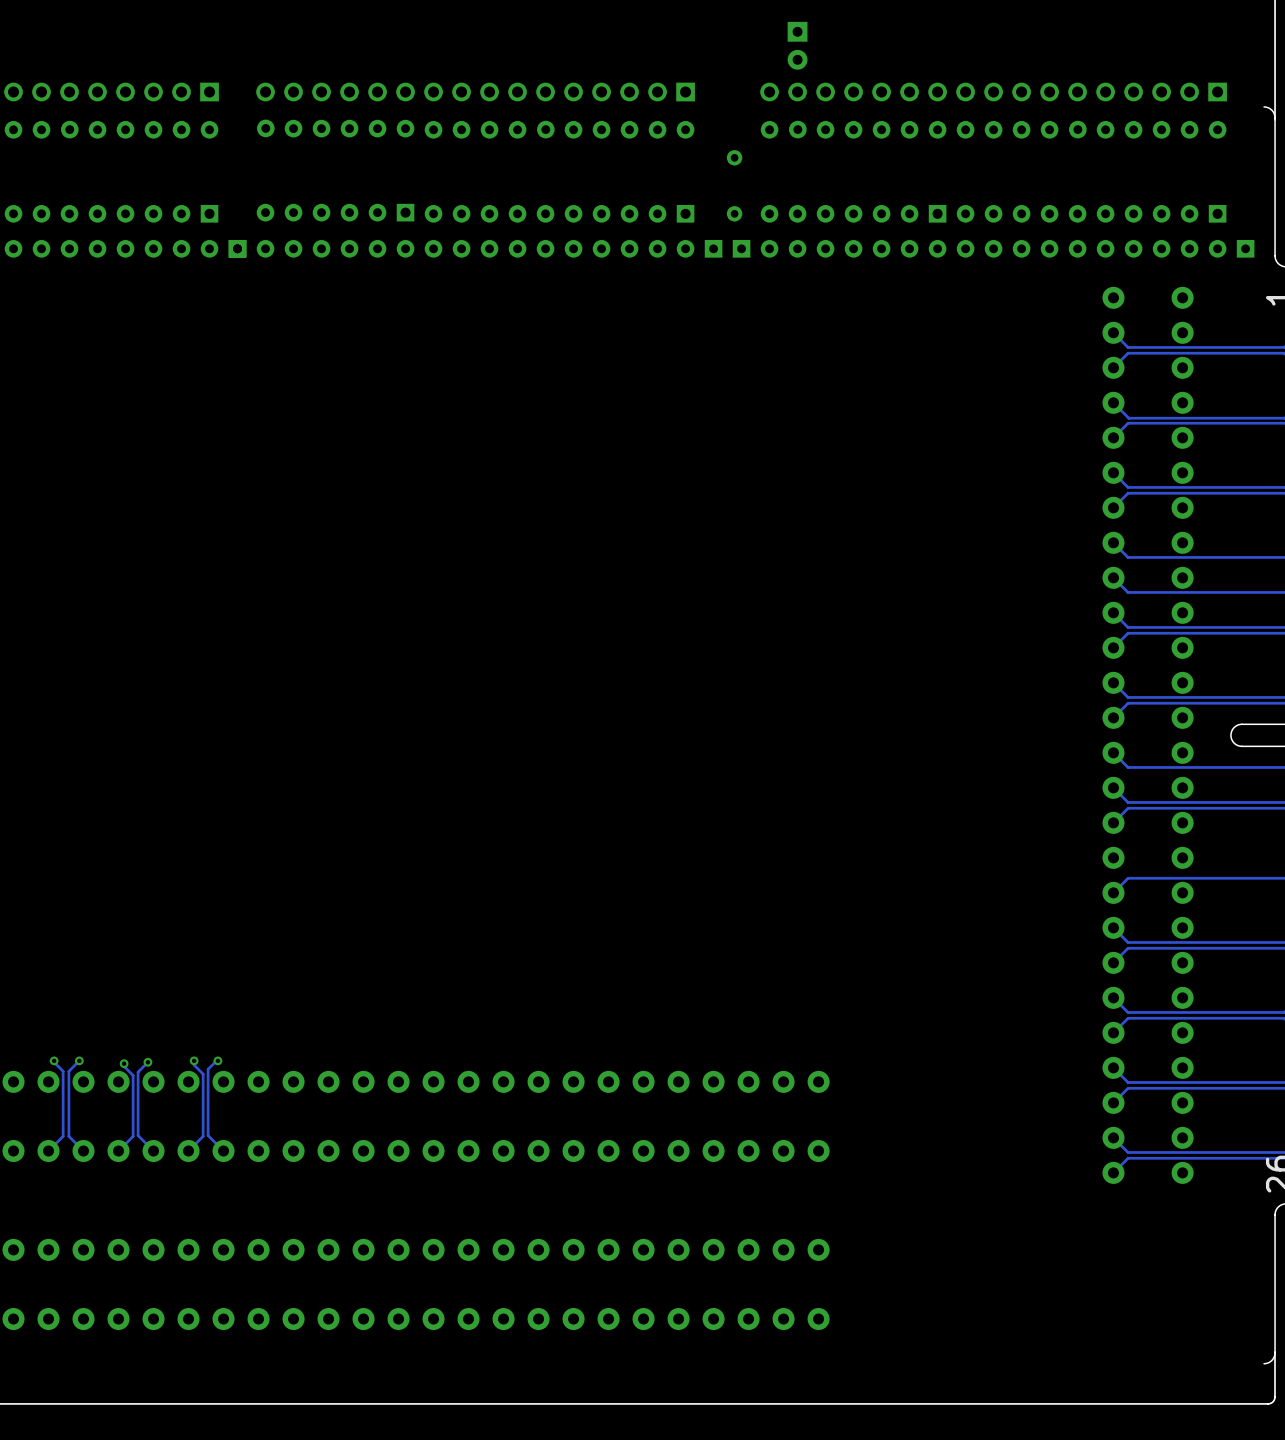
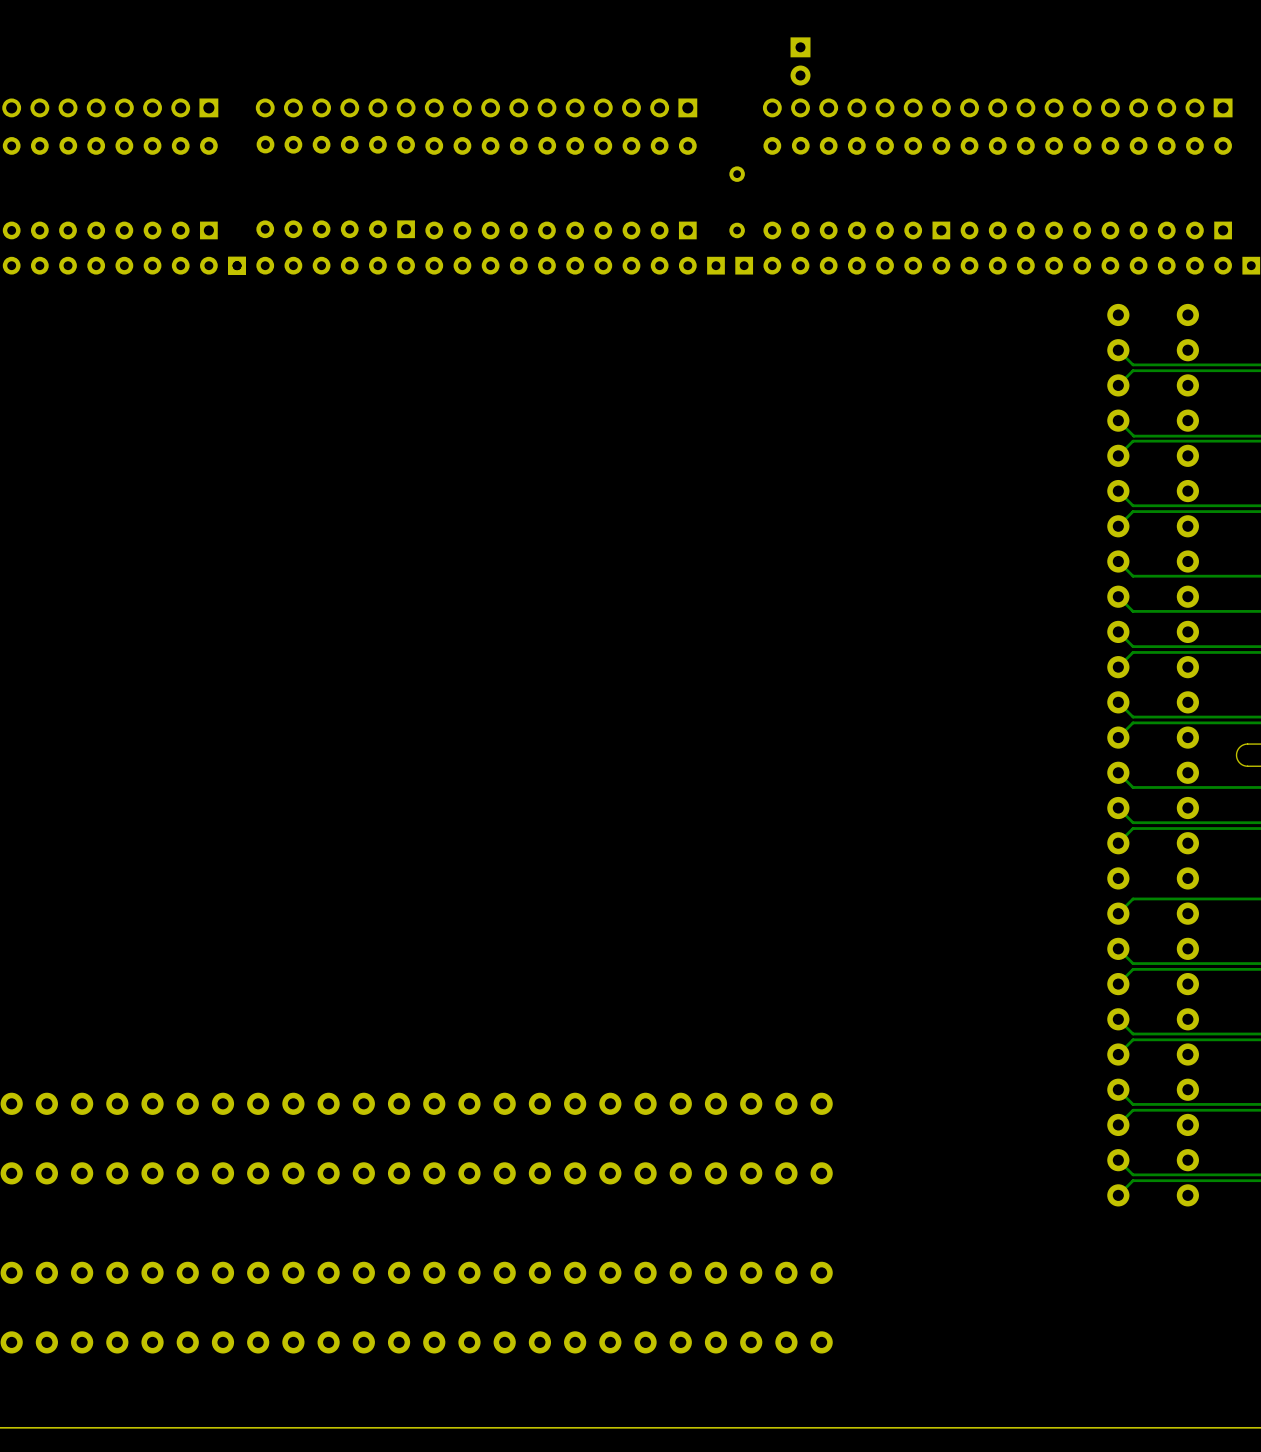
track: (80, 1059) (68, 1071) (68, 1136) (83, 1151) -> none
track: (217, 1059) (208, 1069) (208, 1135) (223, 1151) -> none
track: (52, 1060) (63, 1071) (63, 1136) (48, 1151) -> none
via: (54, 1060) -> none
via: (79, 1060) -> none
track: (194, 1060) (194, 1065) (203, 1074) (203, 1136) (188, 1151) -> none
via: (194, 1060) -> none
via: (217, 1060) -> none
track: (147, 1062) (138, 1072) (138, 1135) (153, 1151) -> none
via: (147, 1062) -> none
track: (121, 1063) (124, 1063) (124, 1066) (133, 1075) (133, 1136) (118, 1151) -> none
via: (124, 1063) -> none

